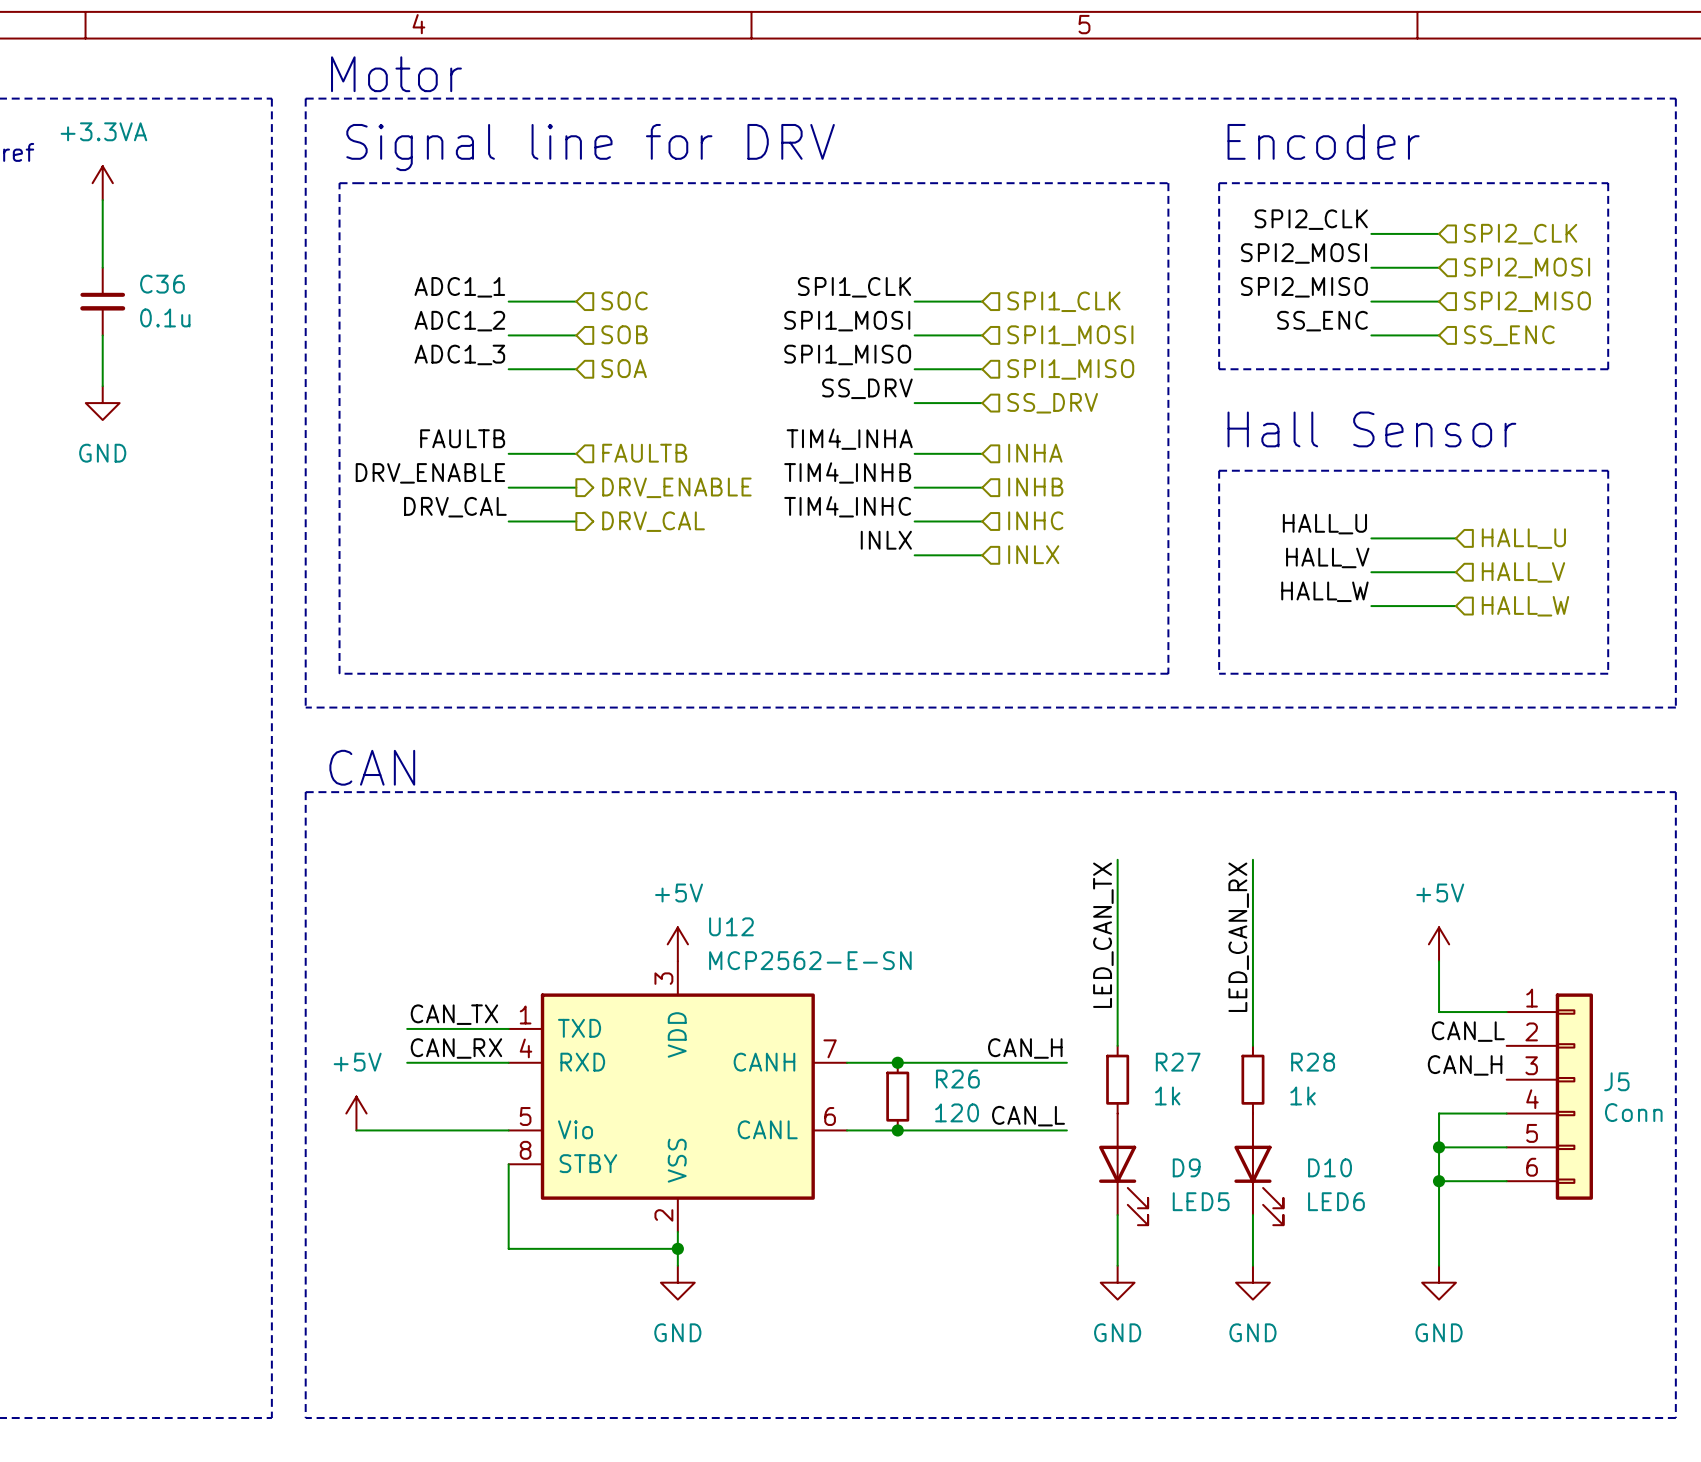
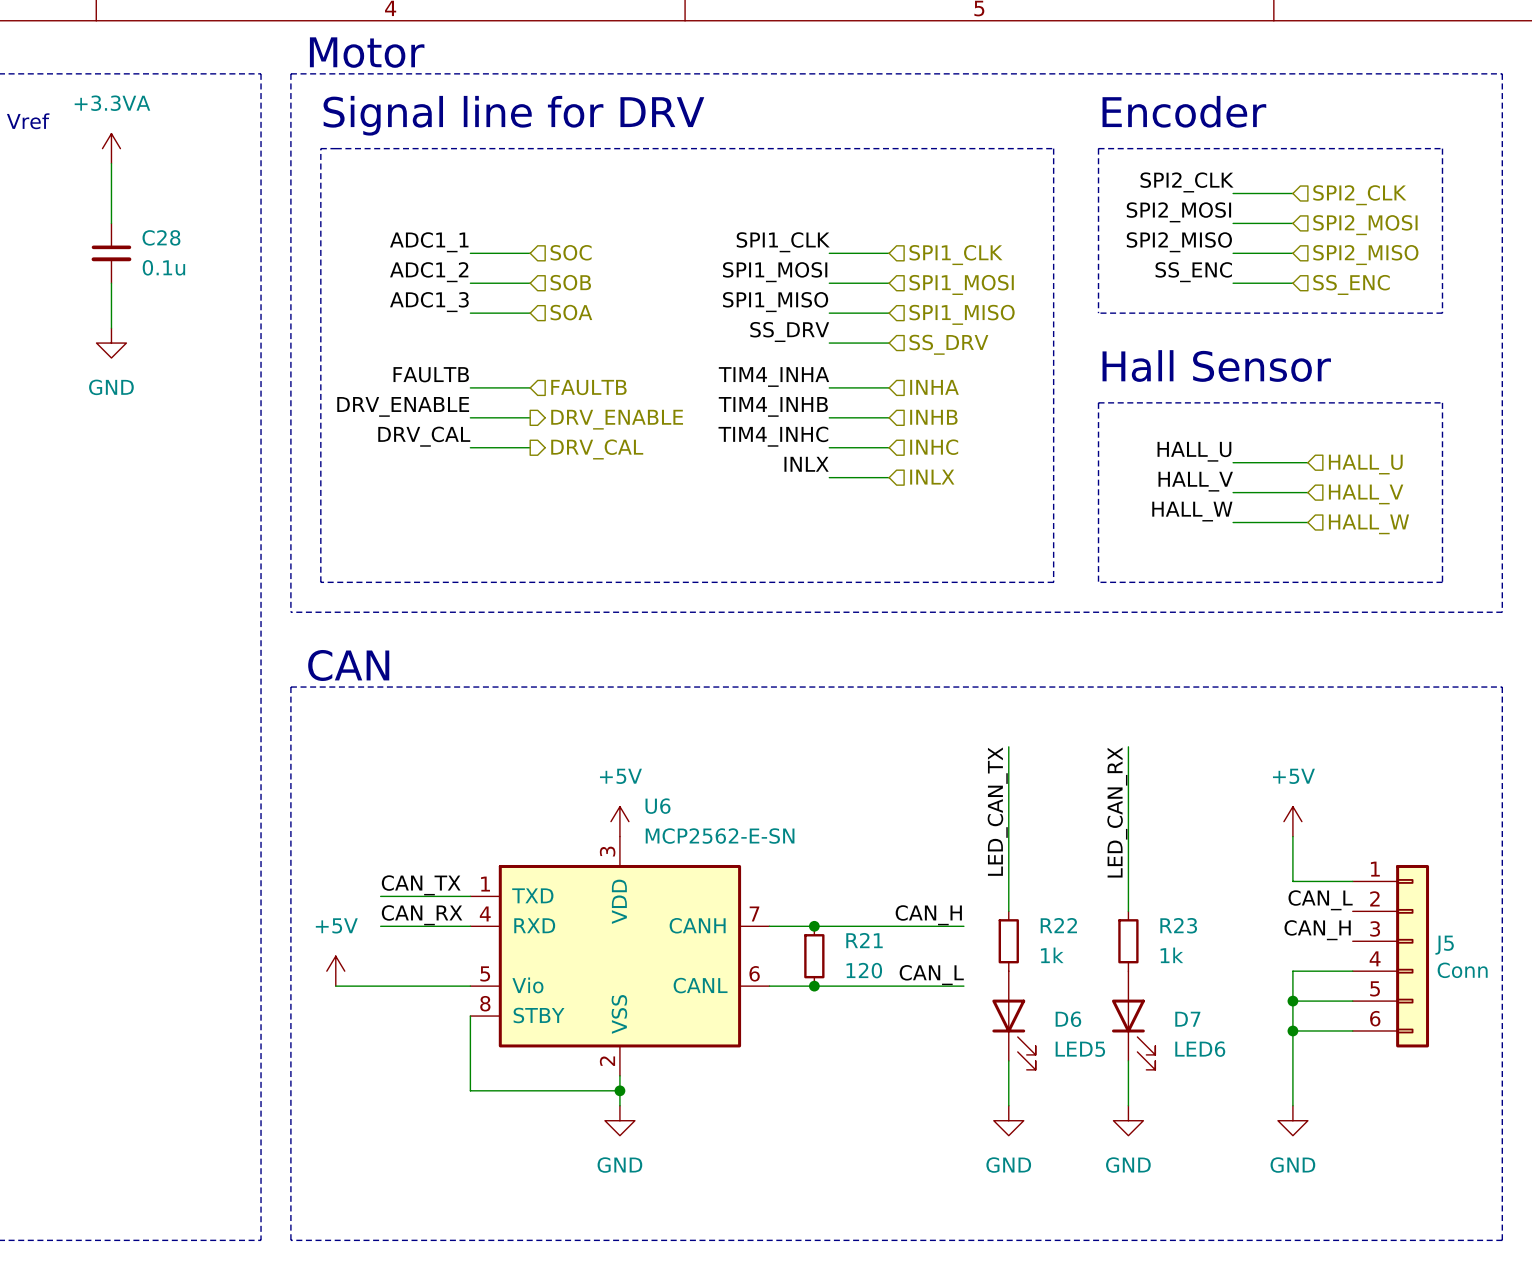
C36 name: C36 (162, 284) -> C28 (161, 237)
U12 name: U12 (731, 926) -> U6 (658, 806)
R27 name: R27 (1178, 1062) -> R22 (1058, 925)
R28 name: R28 (1313, 1062) -> R23 (1178, 925)
R26 name: R26 (957, 1079) -> R21 (864, 940)
D9 name: D9 (1186, 1167) -> D6 (1068, 1019)
D10 name: D10 (1330, 1167) -> D7 (1187, 1019)

